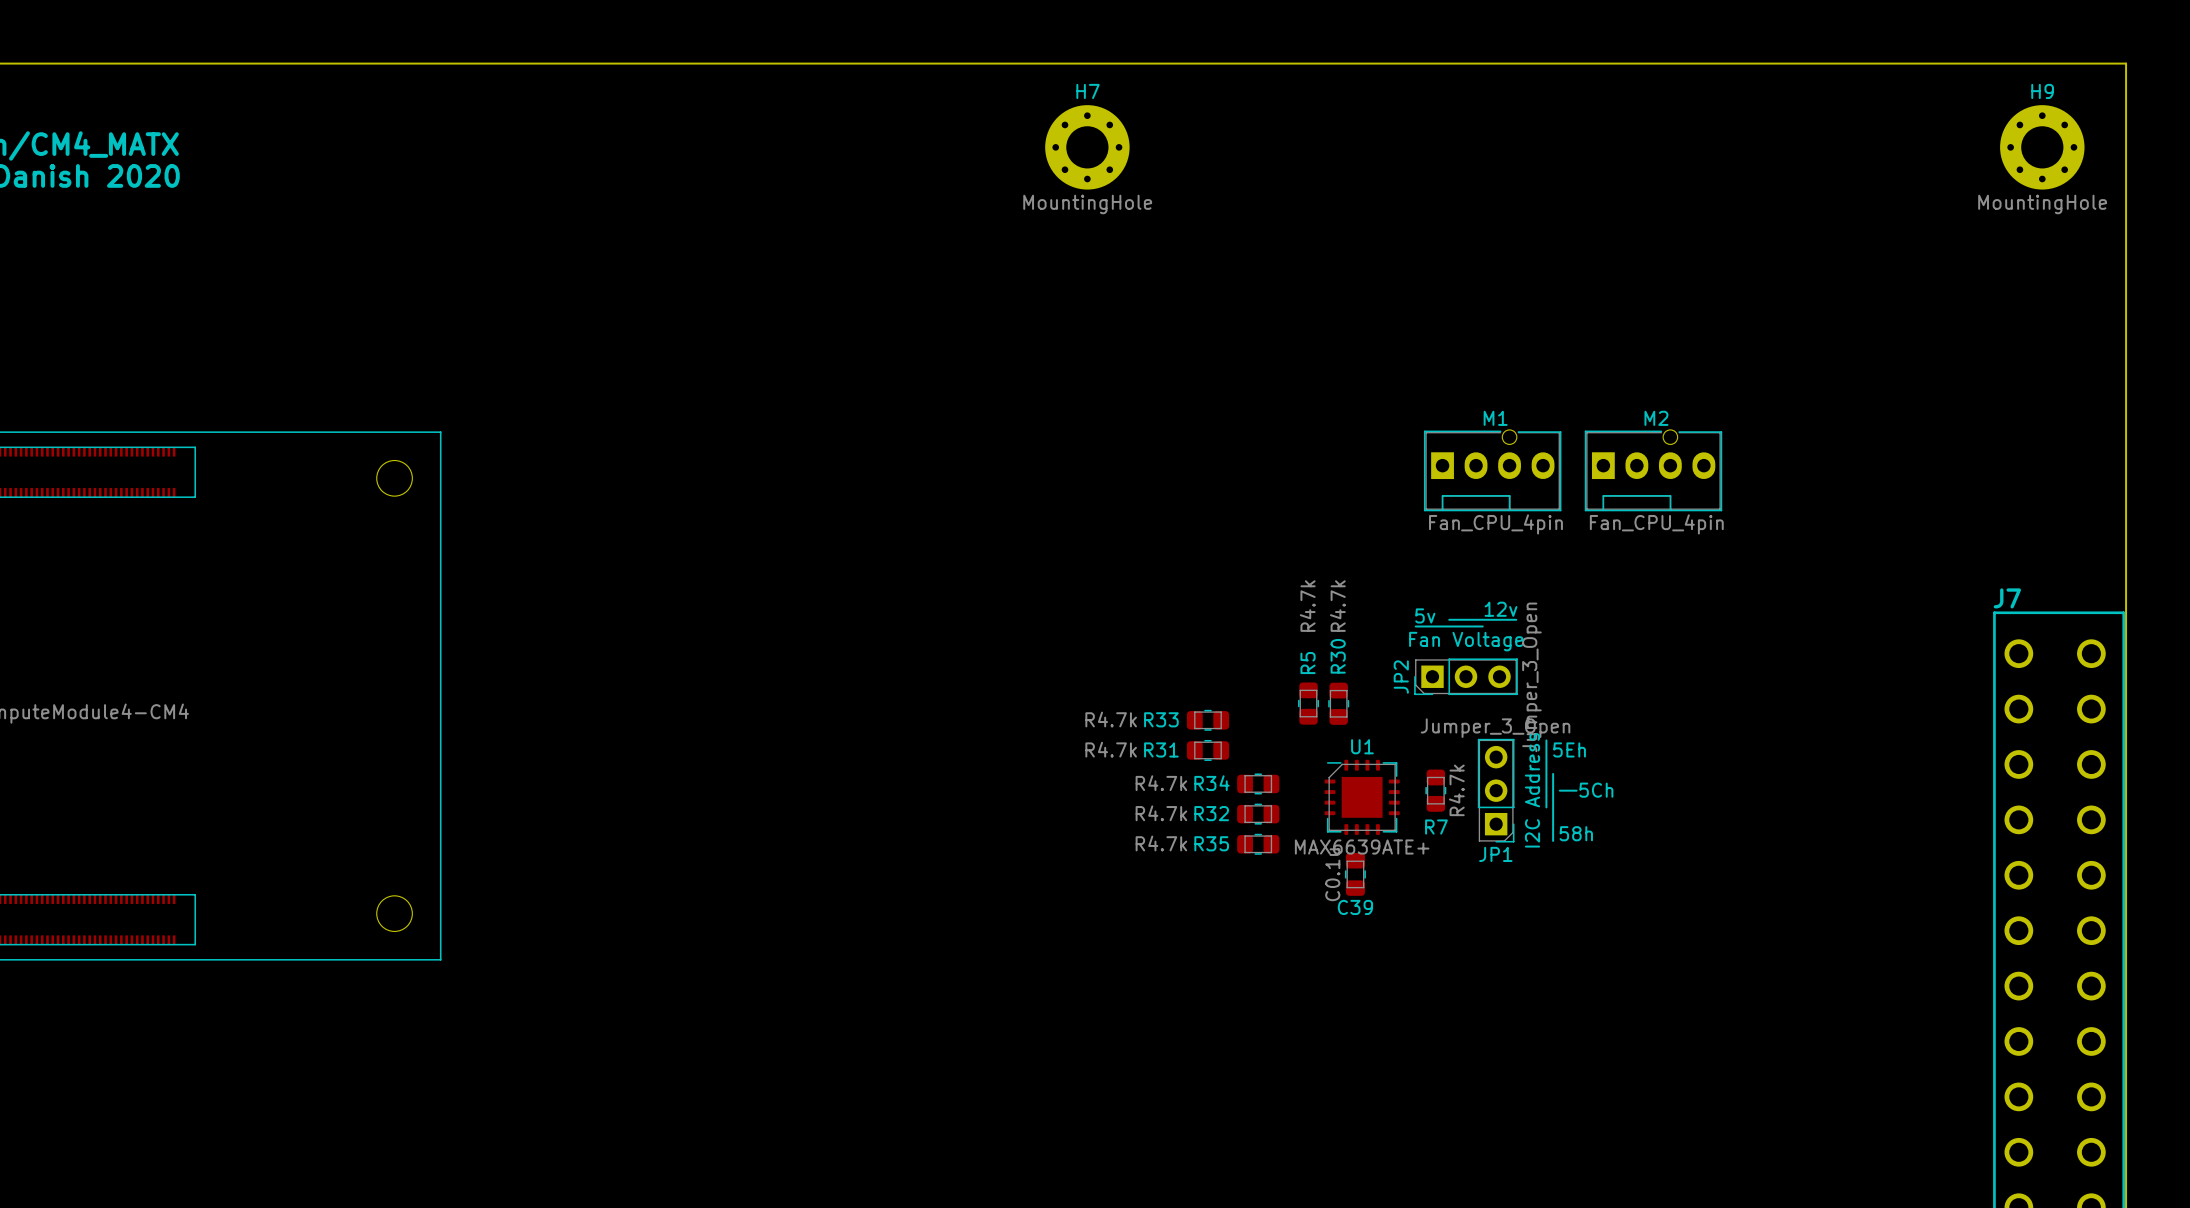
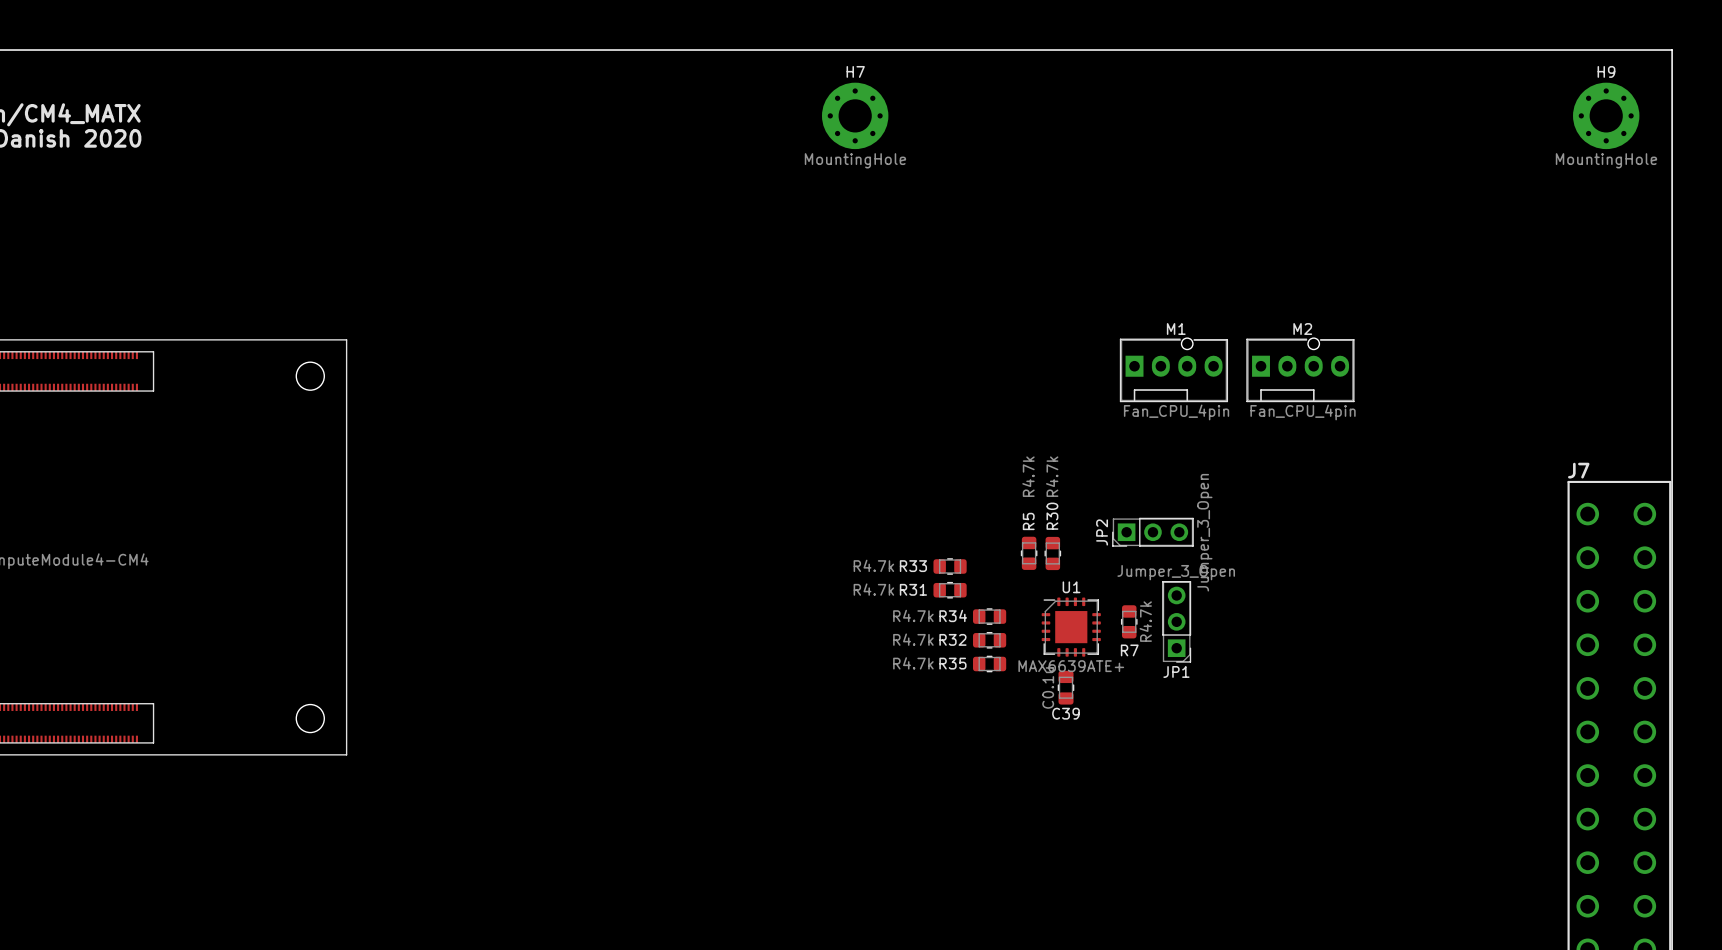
text: 12v (1501, 609) -> none
text: 5v (1425, 615) -> none
line: (1449, 619) (1516, 619) -> none
line: (1415, 626) (1482, 626) -> none
text: Fan Voltage (1466, 641) -> none
line: (1546, 740) (1546, 807) -> none
text: 5Eh (1569, 749) -> none
line: (1553, 773) (1553, 840) -> none
text: I2C Address (1532, 790) -> none
line: (1559, 790) (1576, 790) -> none
text: 5Ch (1596, 790) -> none
text: 58h (1576, 833) -> none

